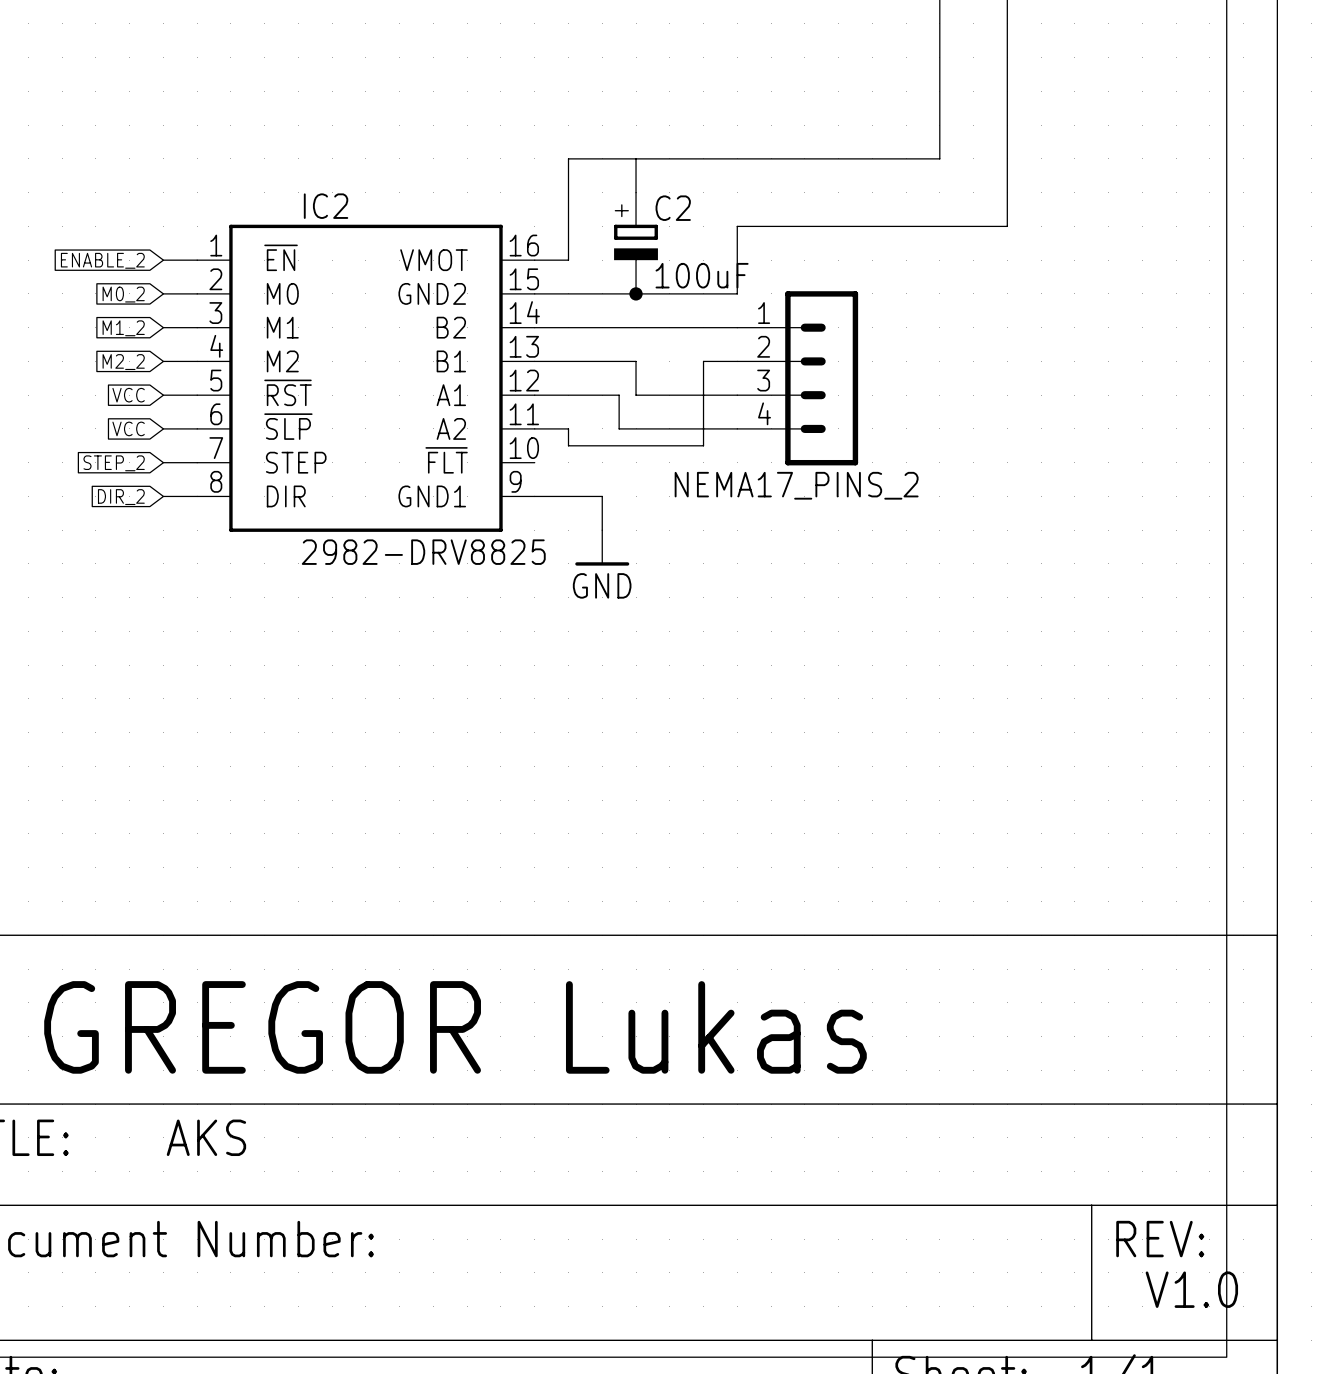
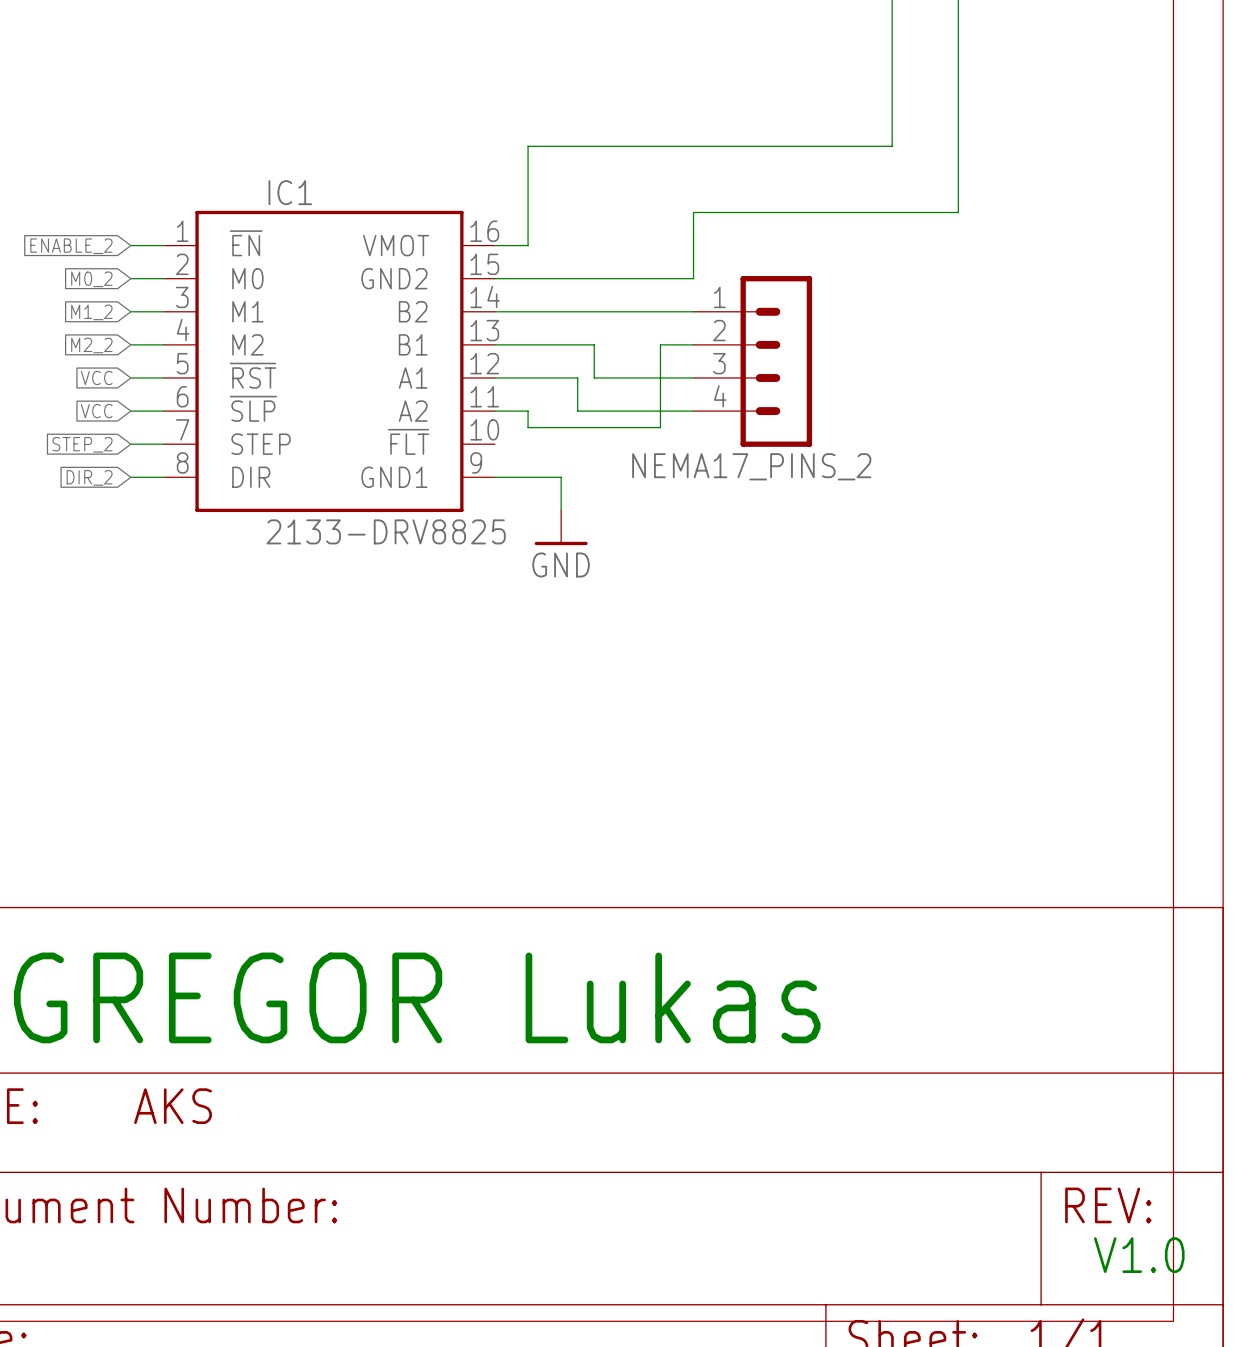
wire: (636, 158) (636, 192) -> none
IC2 name: IC2 (326, 206) -> IC1 (290, 192)
C2: 100uF (636, 243) -> none
junction: (636, 293) -> none
IC2 value: 2982-DRV8825 (423, 552) -> 2133-DRV8825 (386, 531)

